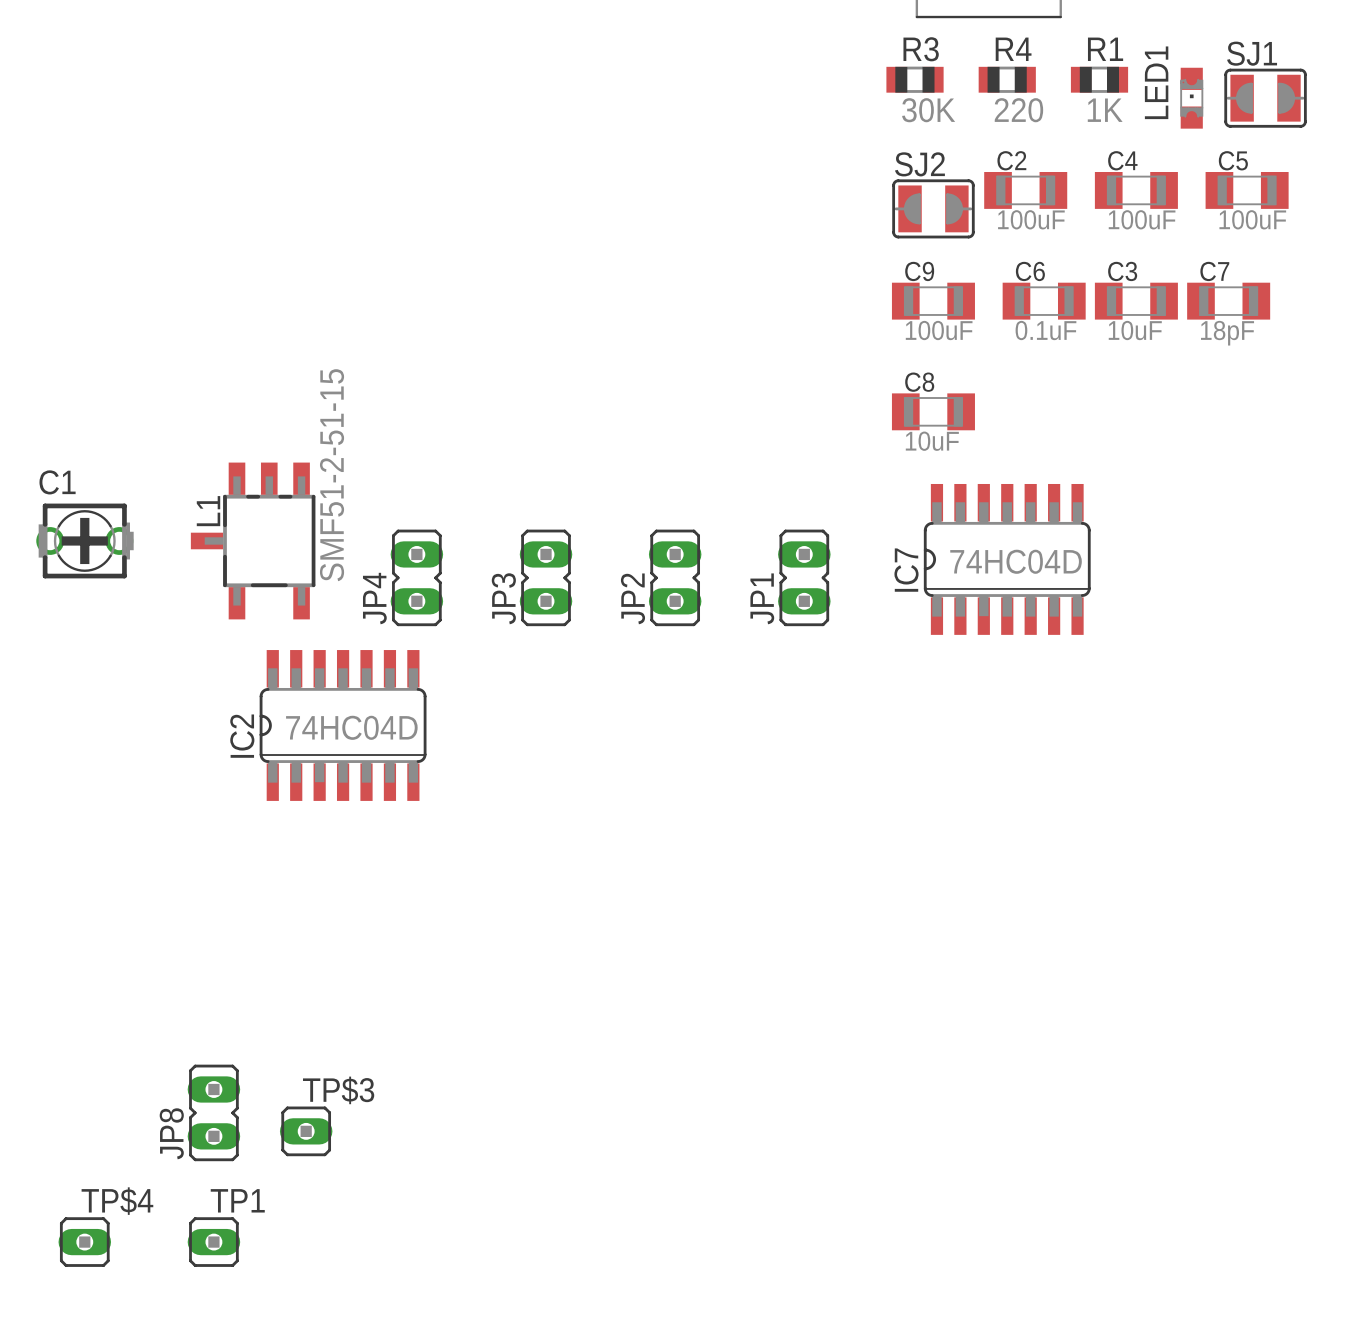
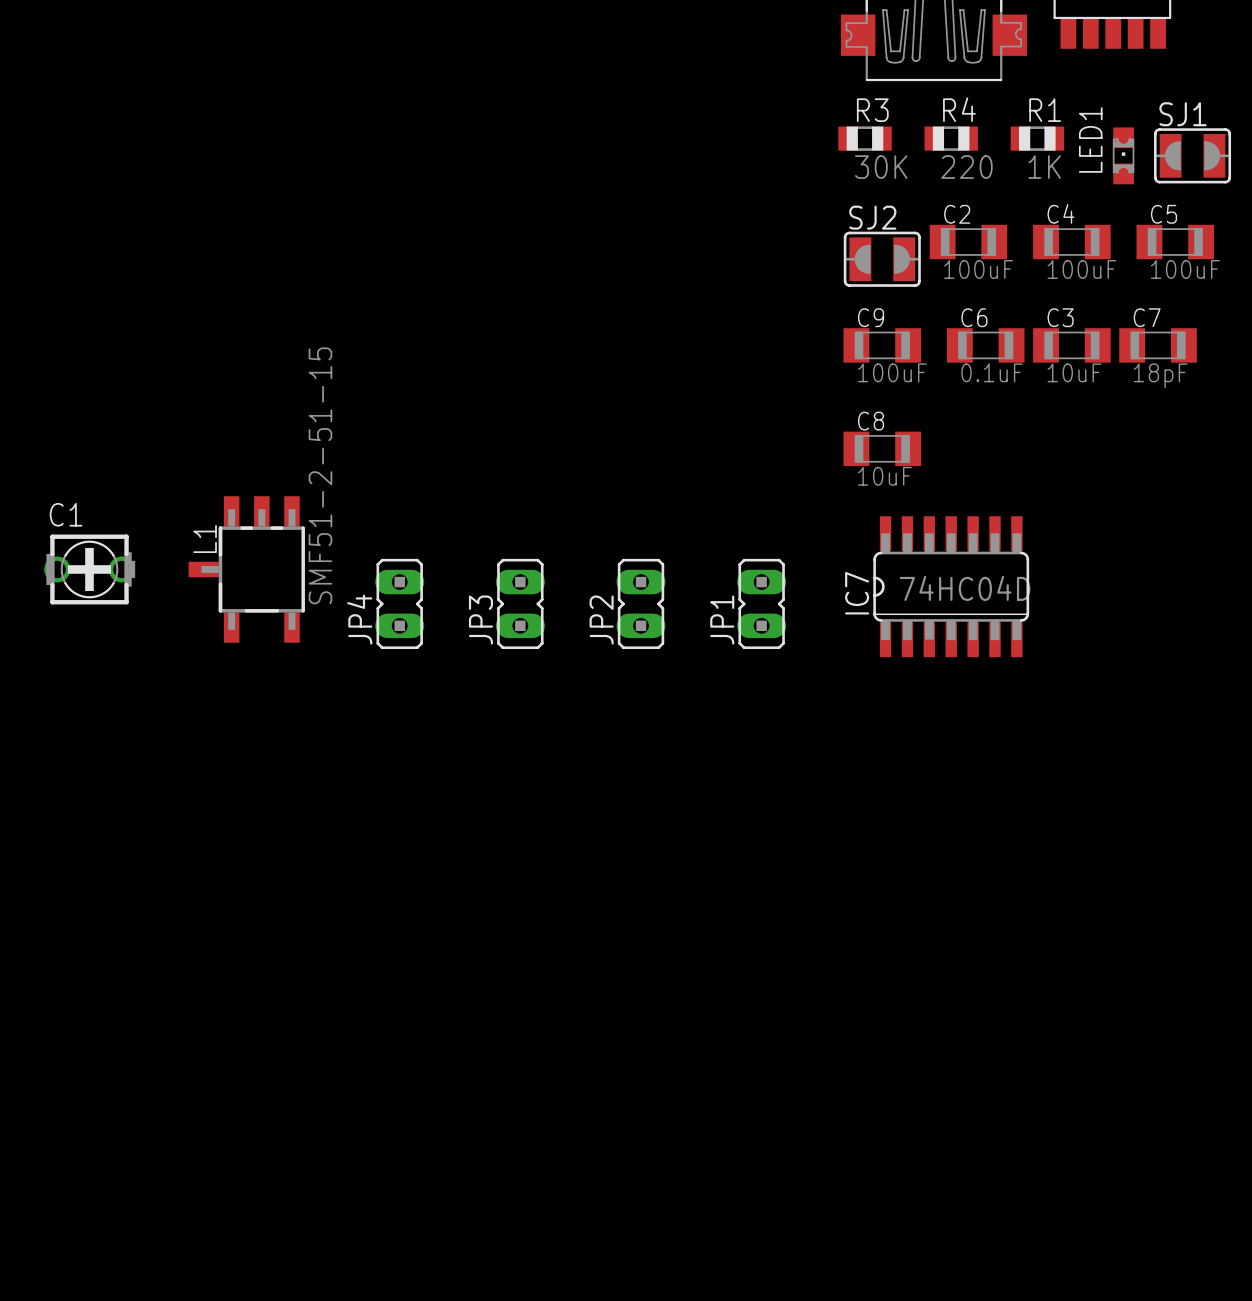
IC2: 74HC04D (343, 725) -> none
JP8: (213, 1112) -> none
TP$3: (306, 1131) -> none
TP$4: (84, 1242) -> none
TP1: (213, 1242) -> none

